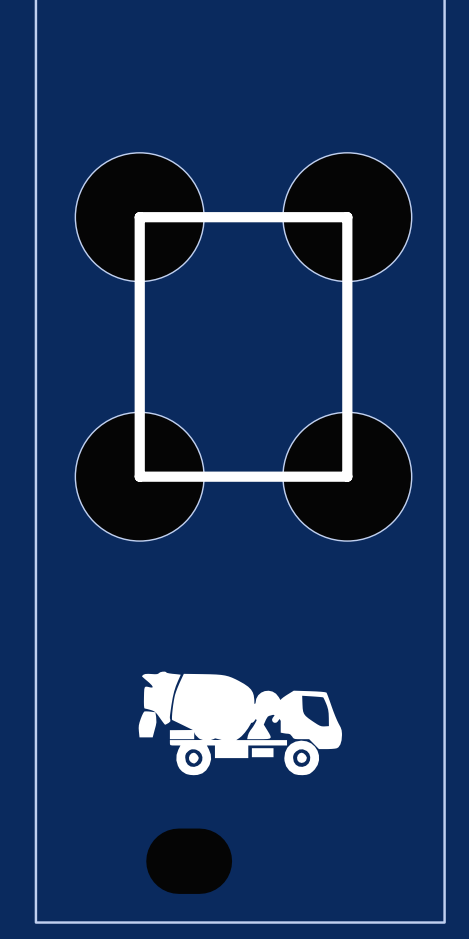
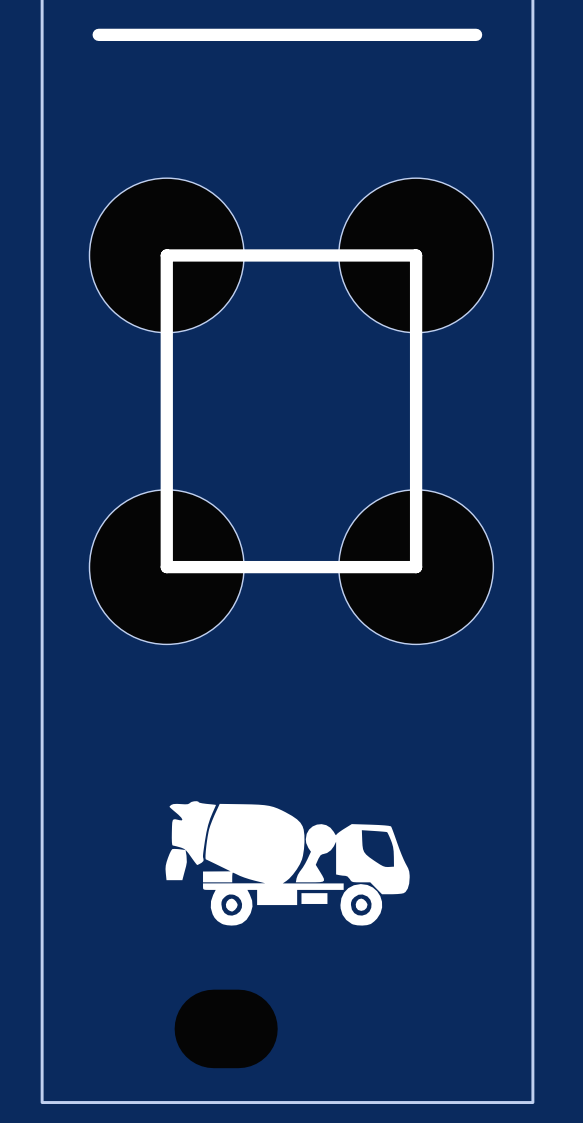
line: none -> (98, 34) (476, 34)
drawing: none -> [165, 801, 410, 926]
part: (240, 723) -> none

